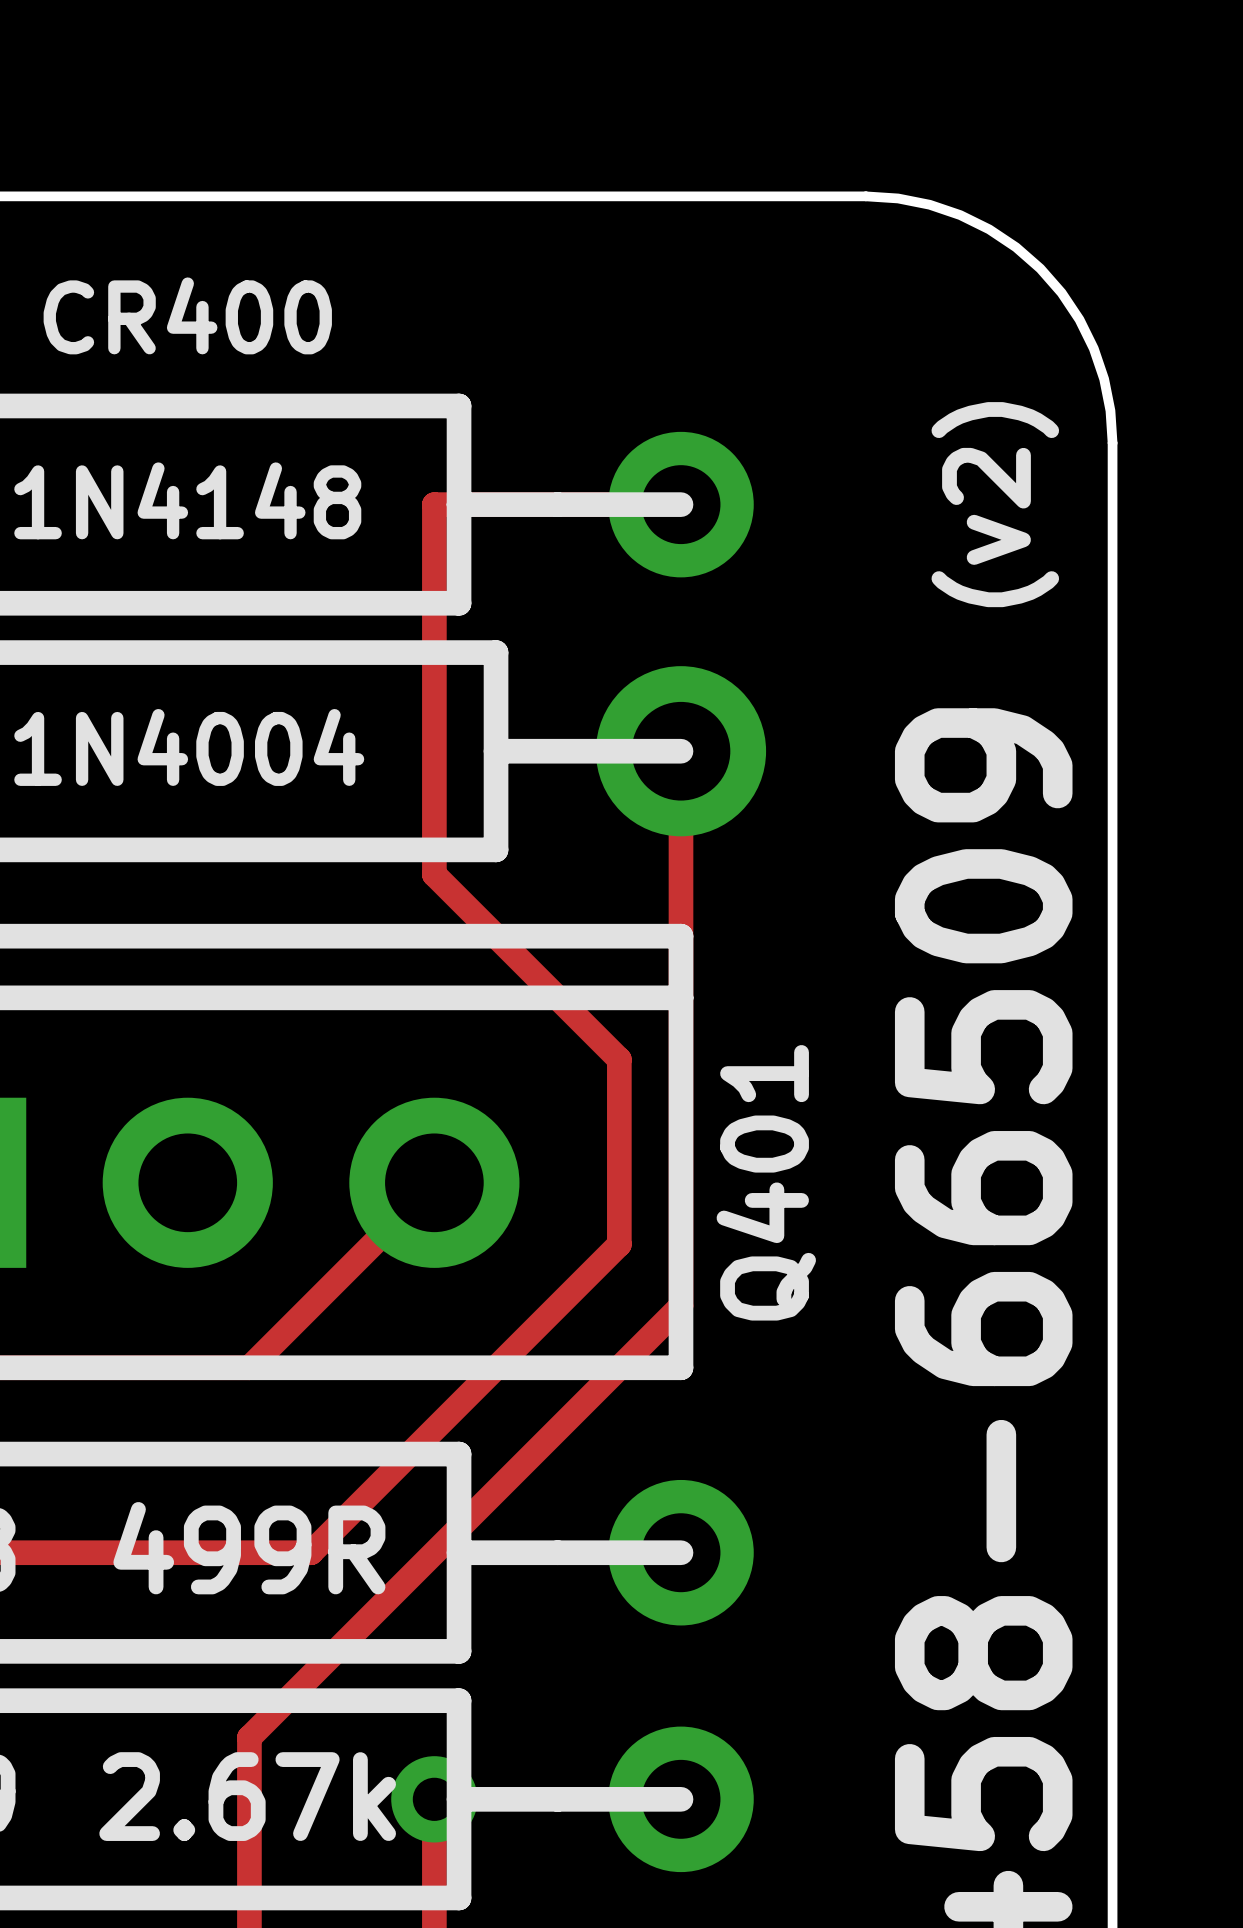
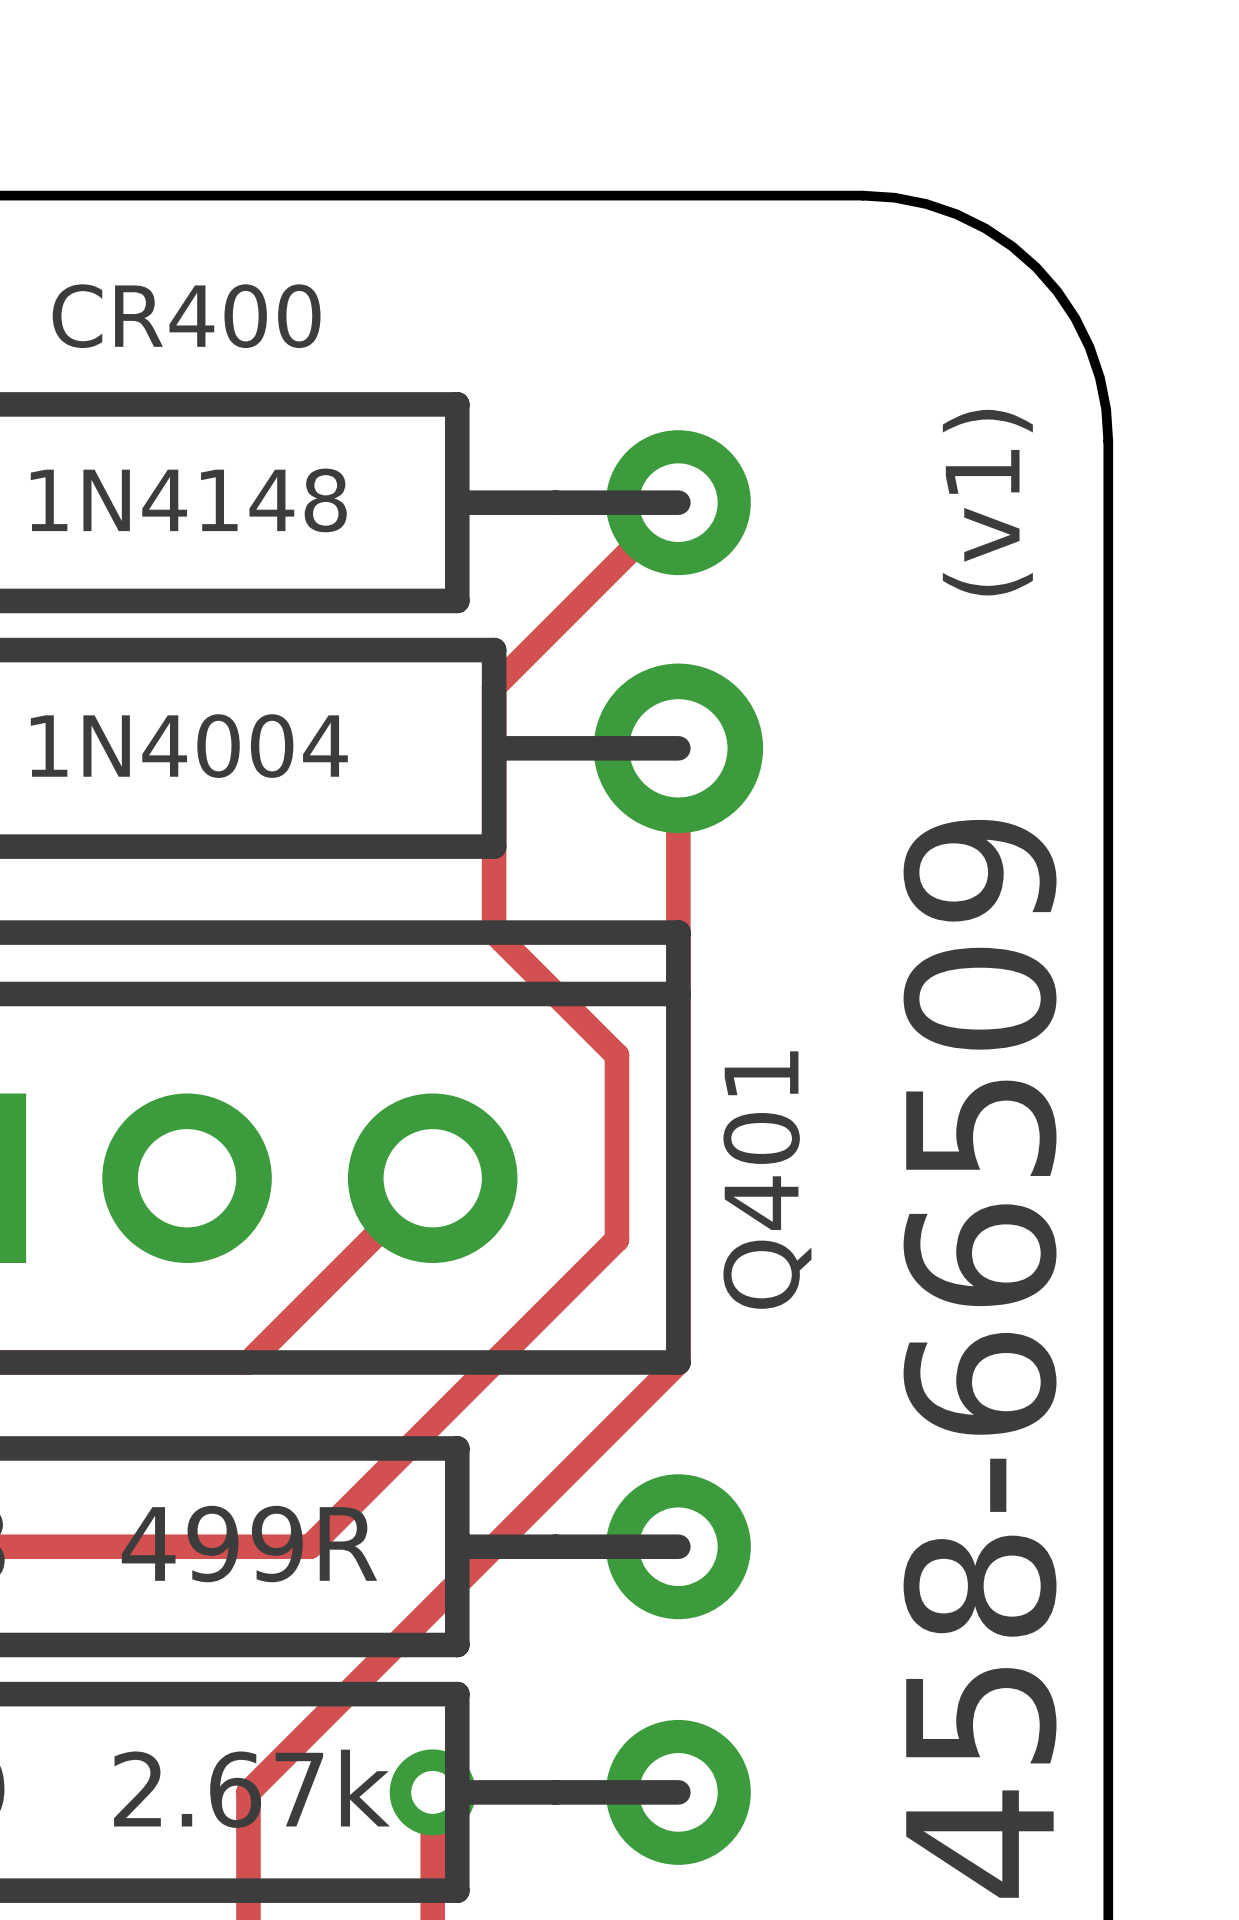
track: (680, 504) (434, 504) (434, 874) (496, 936) -> (678, 502) (494, 686) (494, 932)
text: (v2) (995, 504) -> (v1) (987, 502)
track: (680, 1306) (249, 1737) (249, 1799) -> (678, 1301) (678, 1362) (248, 1792)

